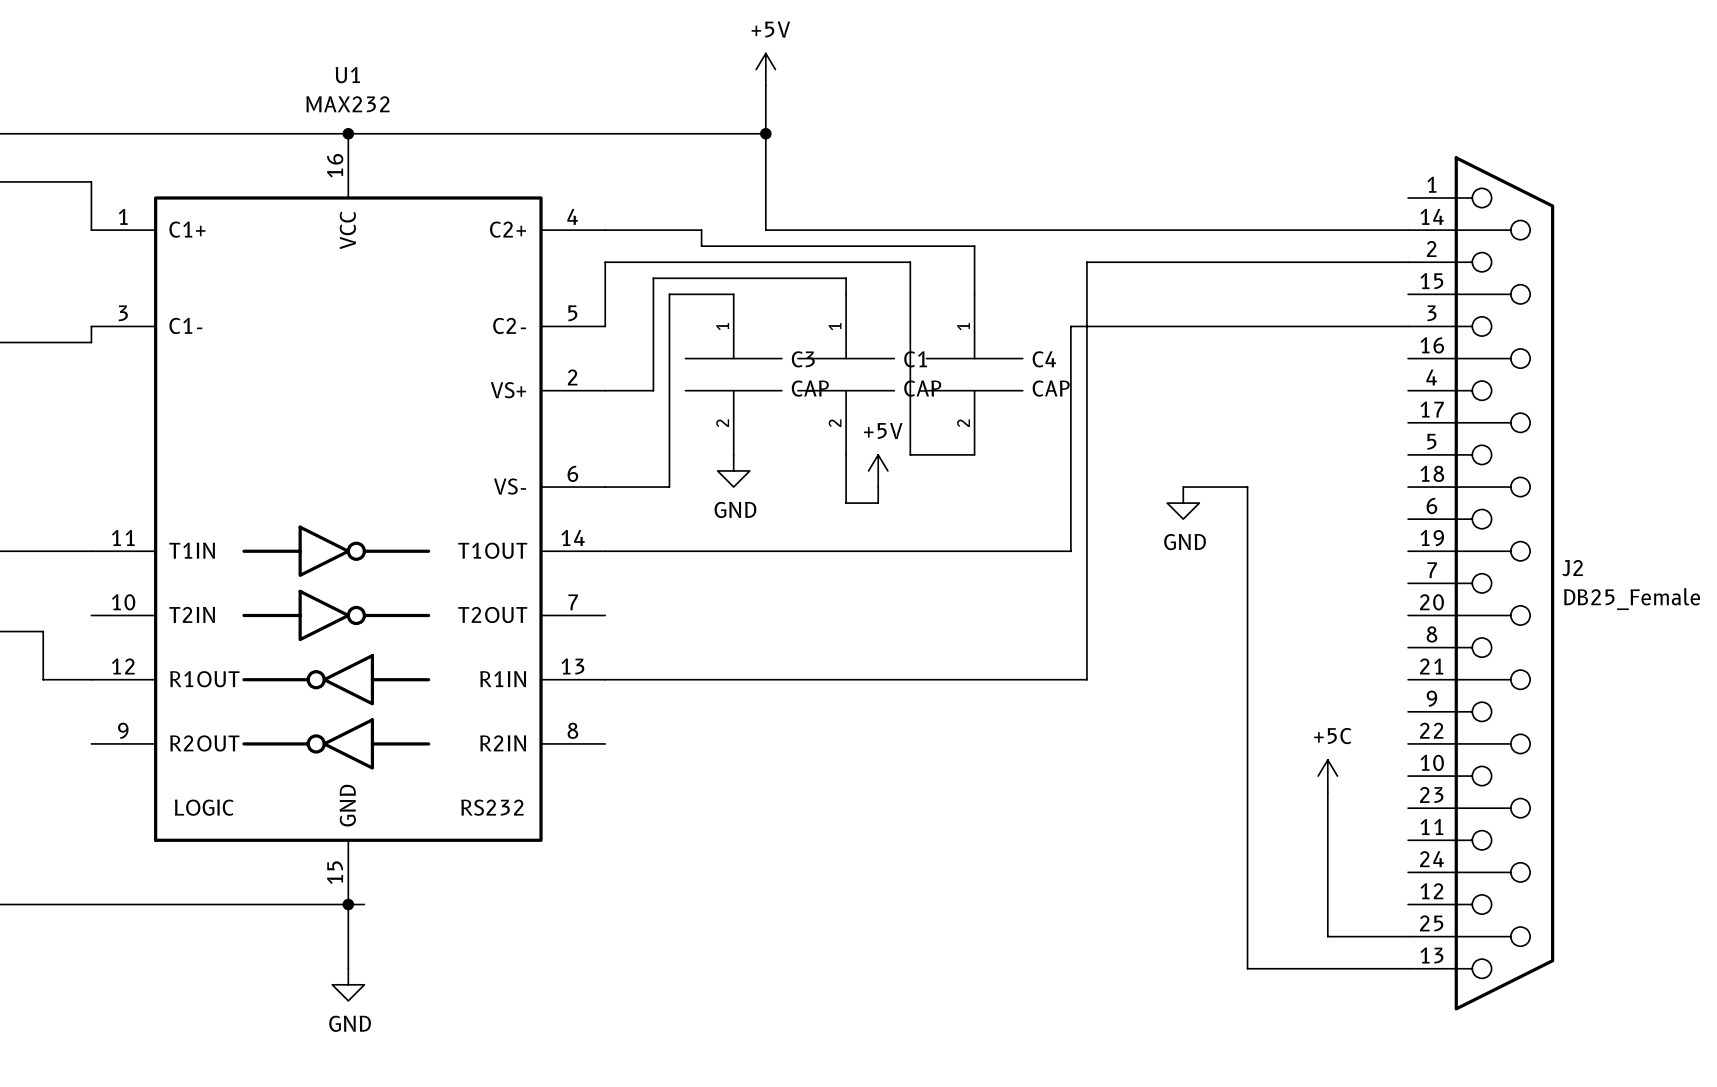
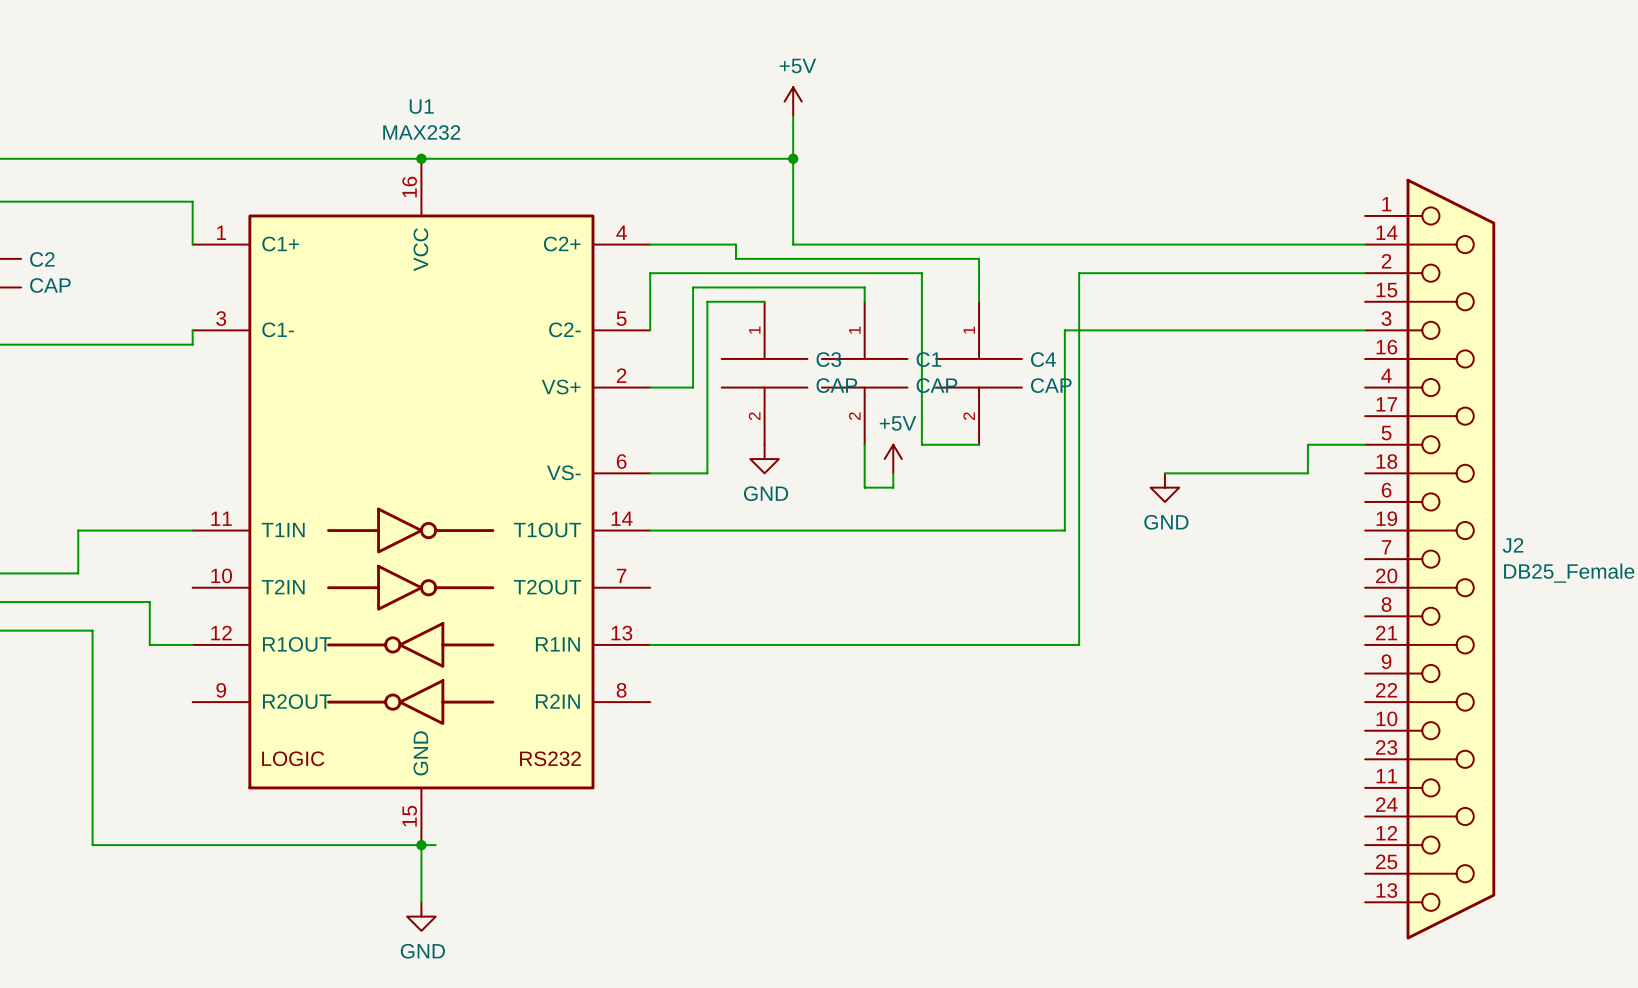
wire: (1247, 487) (1247, 968) (1408, 968) -> (1222, 473) (1307, 473) (1307, 444) (1365, 444)
power symbol: +5C (1327, 776) -> none
wire: (1327, 792) (1327, 936) (1408, 936) -> none

